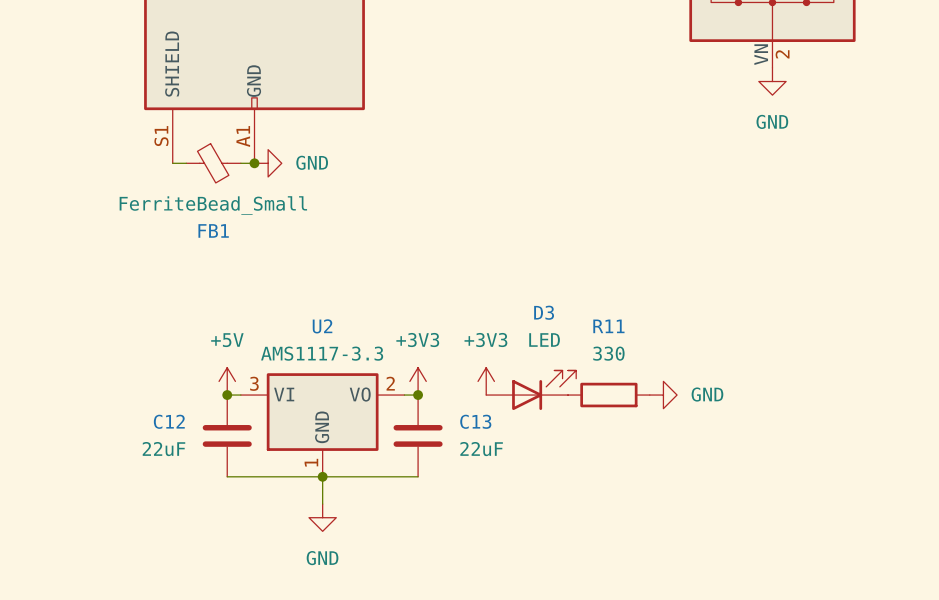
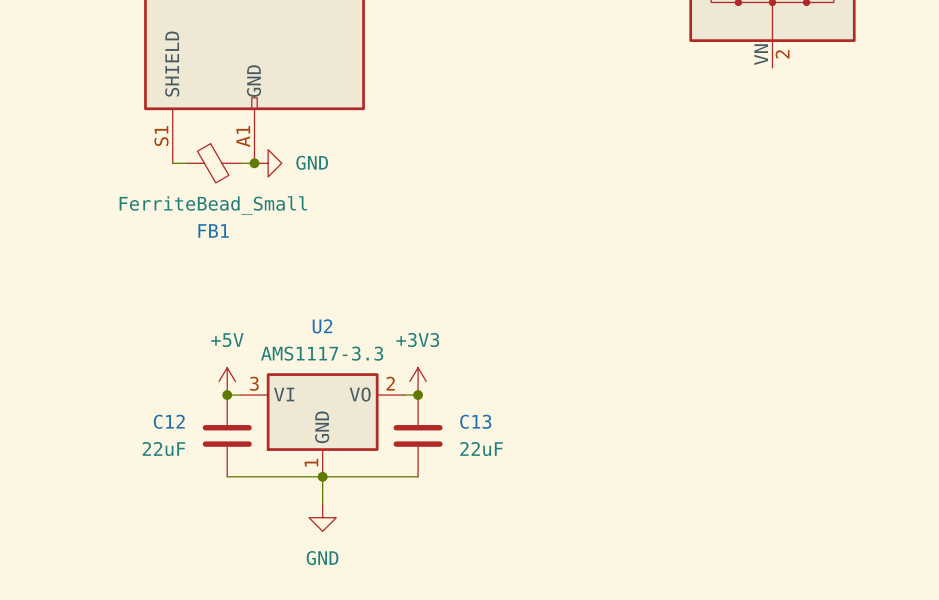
power symbol: GND (772, 81) -> none
power symbol: +3V3 (486, 381) -> none
D3: LED (531, 390) -> none
R11: 330 (608, 395) -> none
power symbol: GND (663, 395) -> none

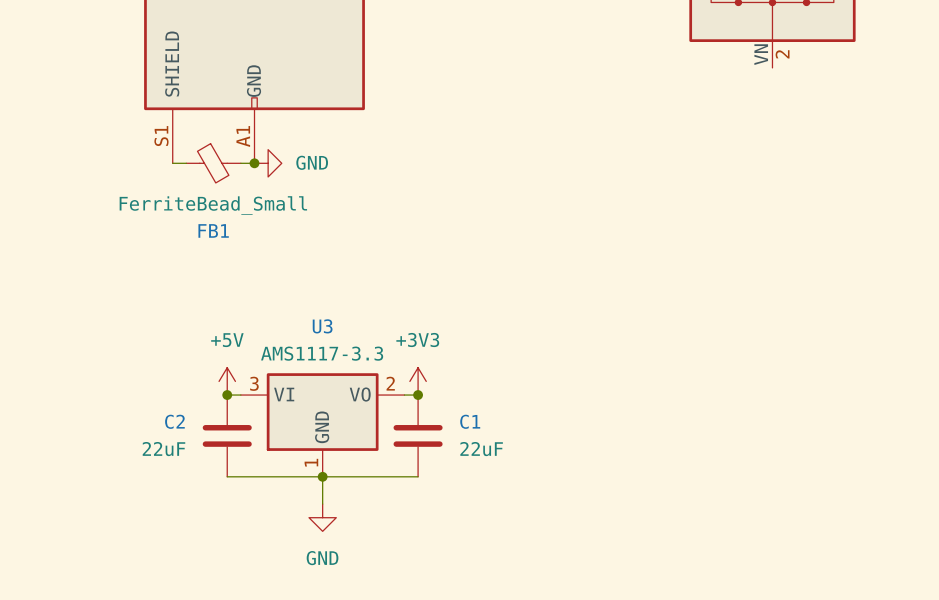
U2 name: U2 (322, 326) -> U3 (322, 326)
C12 name: C12 (169, 421) -> C2 (174, 421)
C13 name: C13 (475, 421) -> C1 (470, 421)

